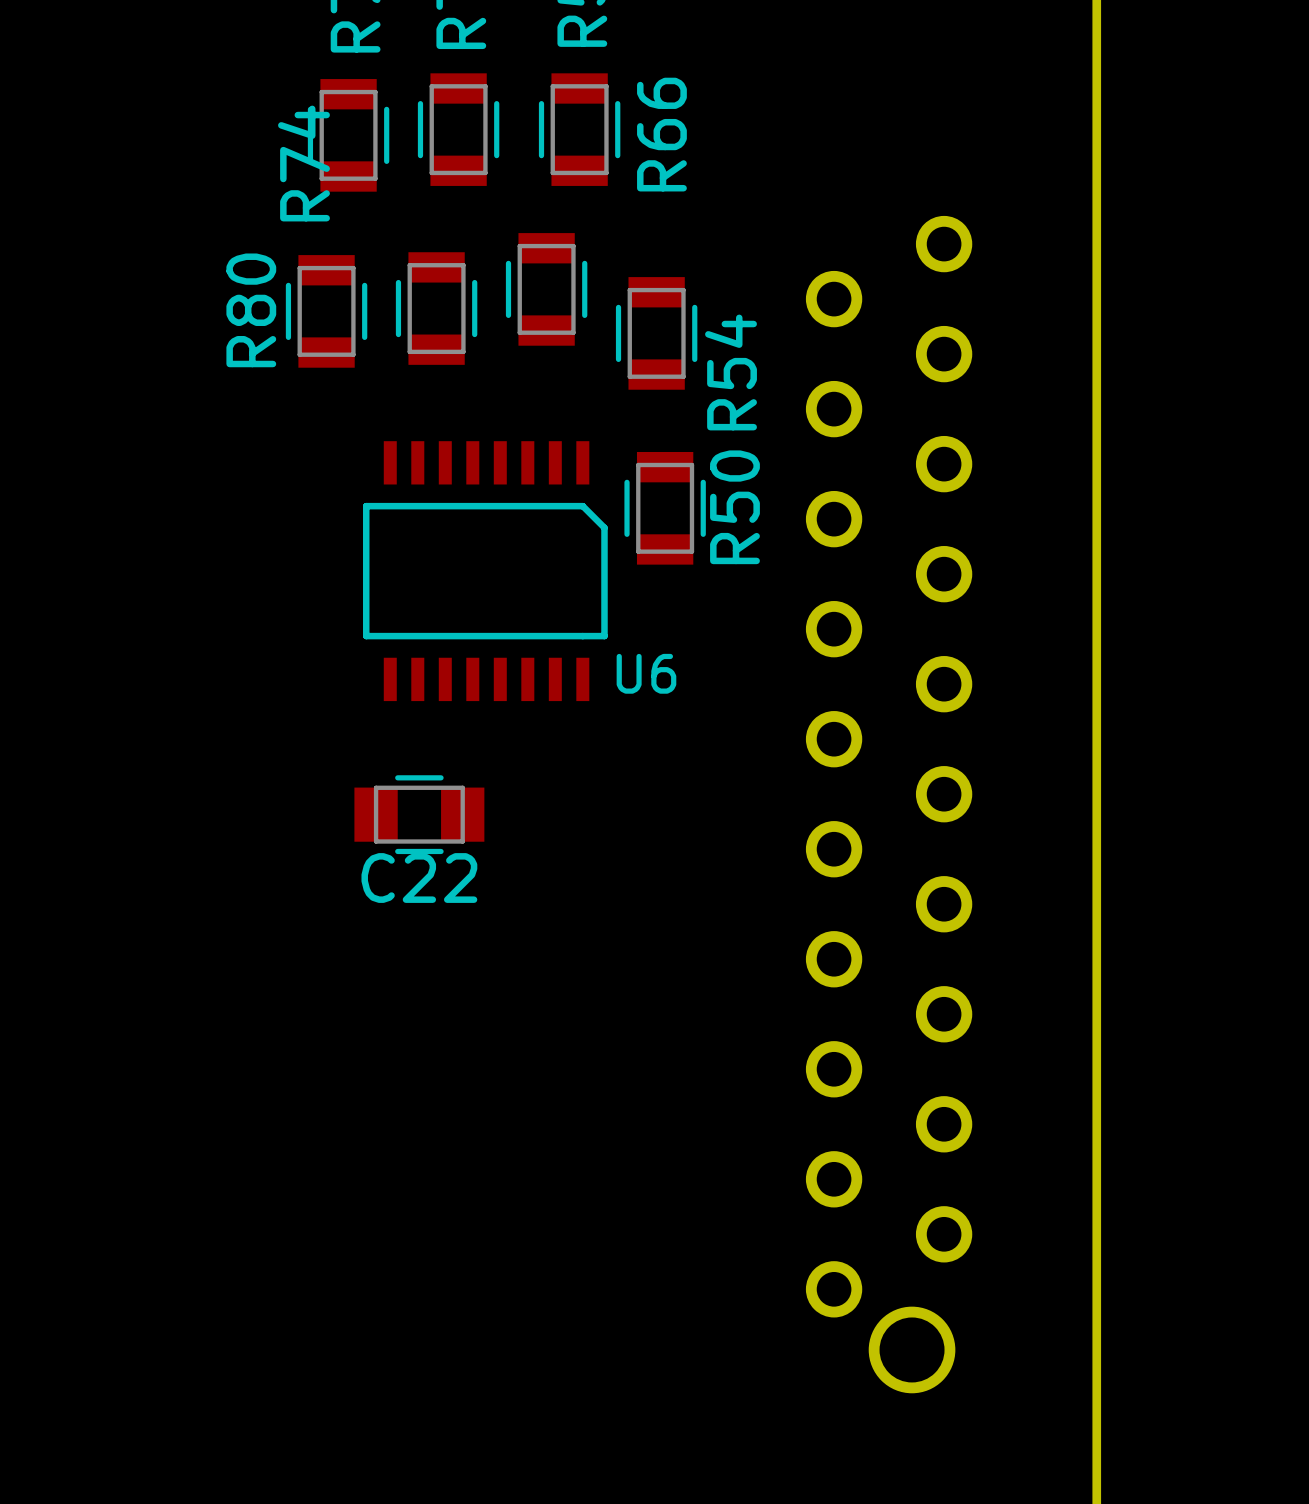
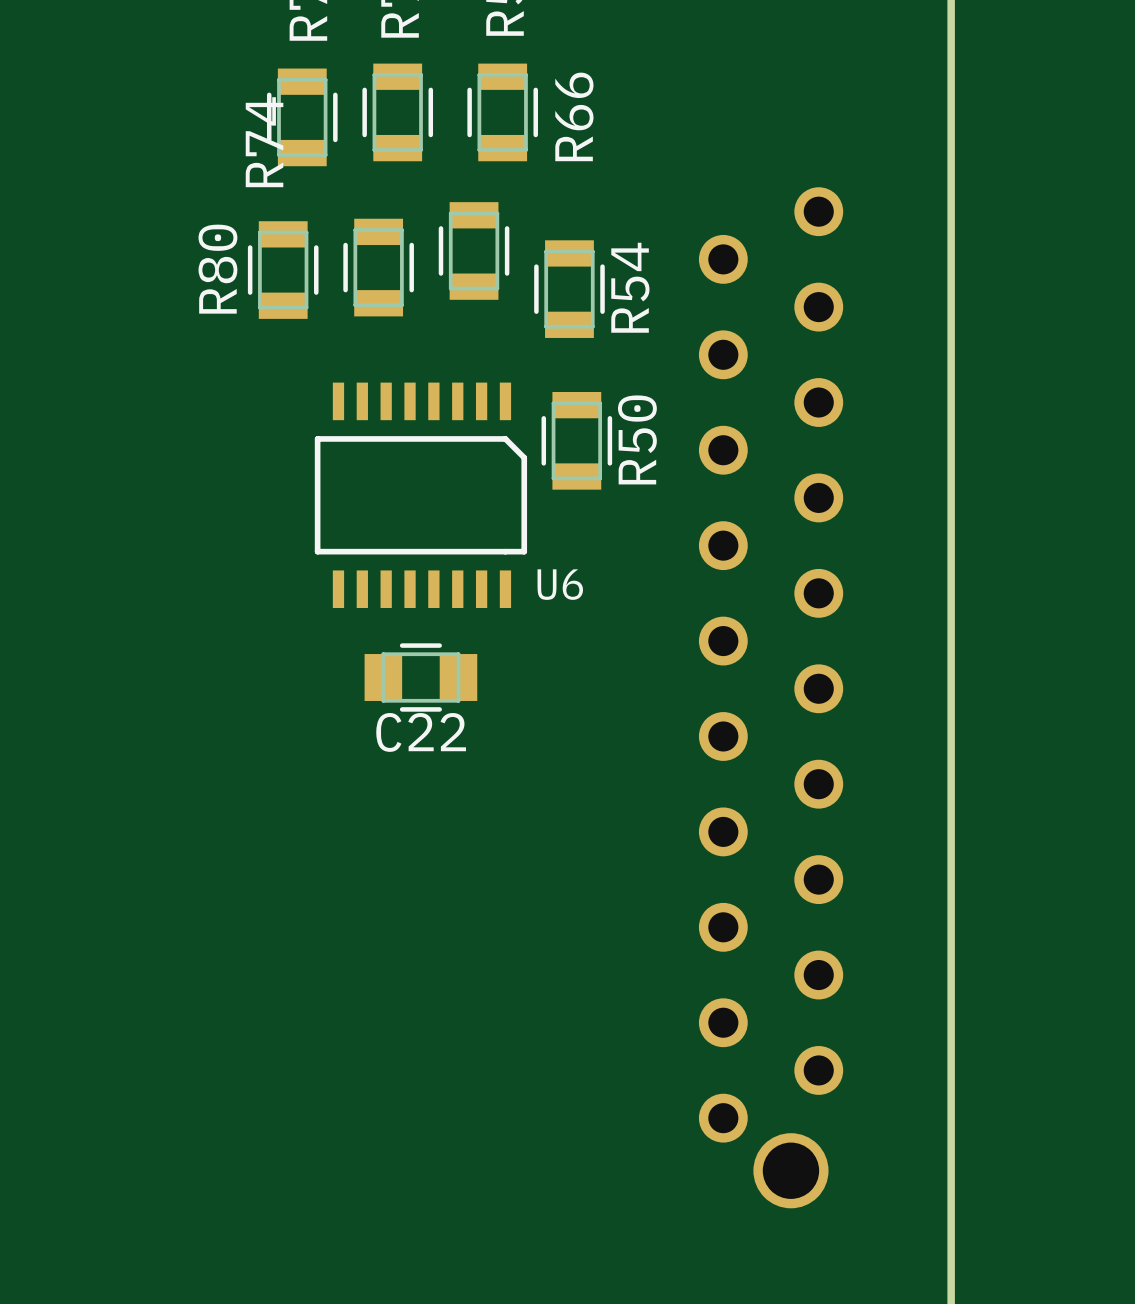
R54 name position: R54 (731, 372) -> R54 (630, 287)
C22 position: (419, 814) -> (420, 677)

